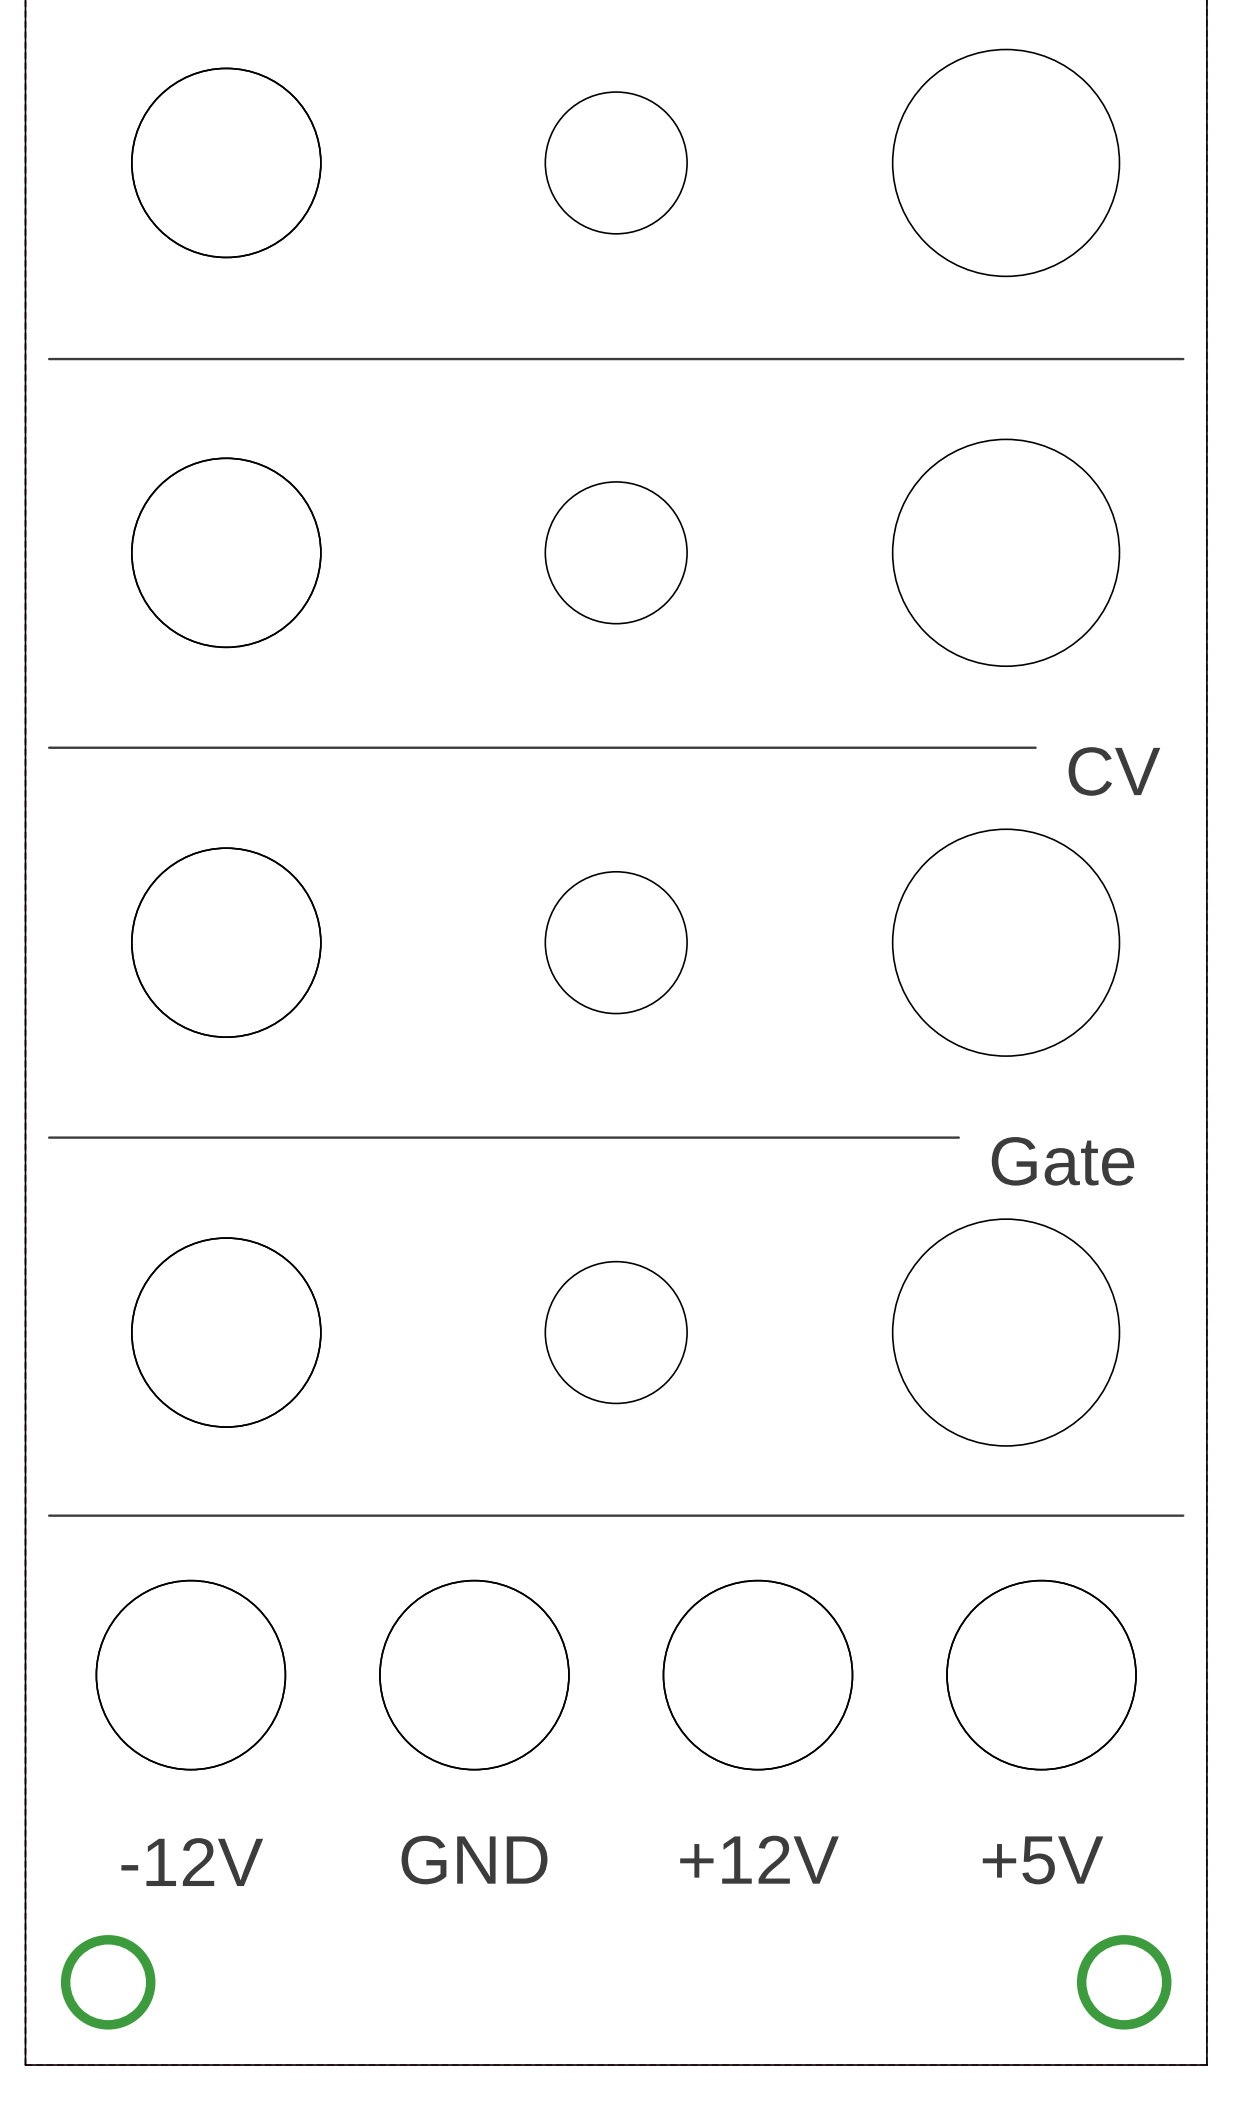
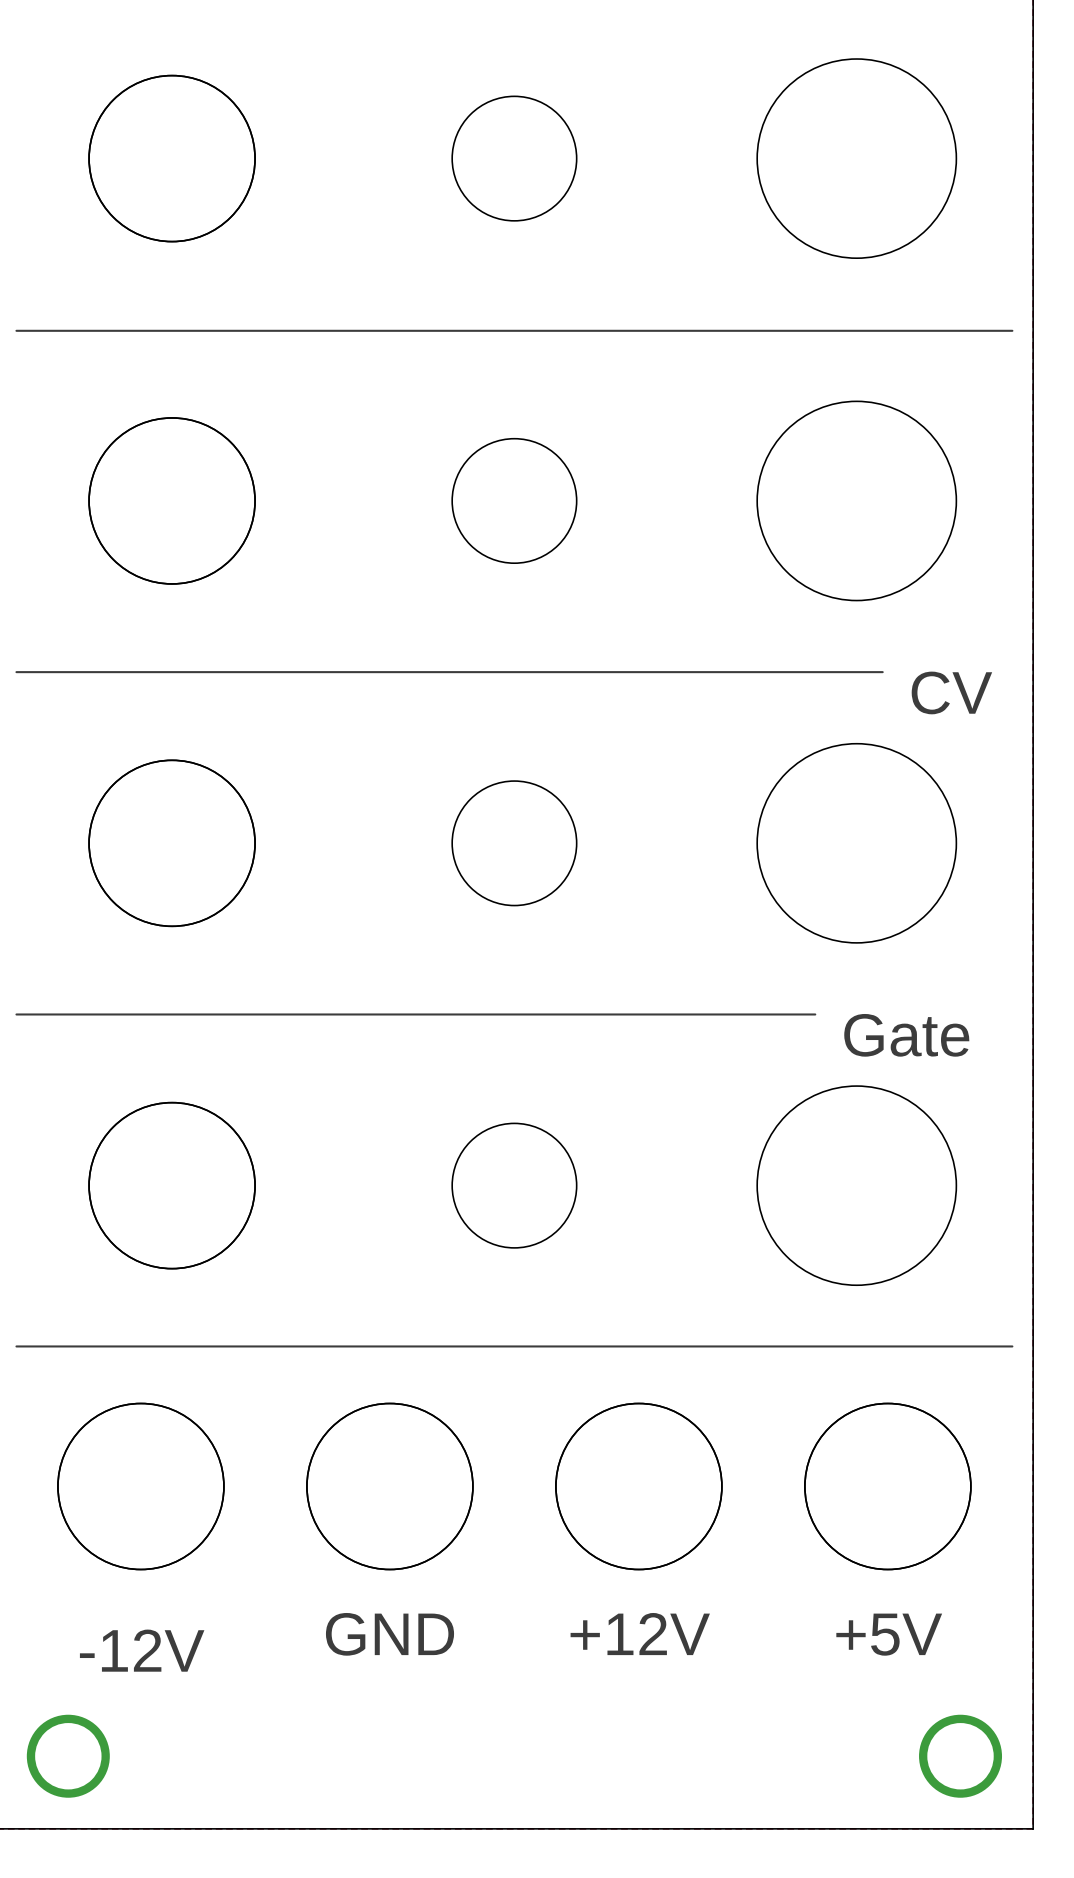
text position: +12V (759, 1859) -> +12V (640, 1634)
text position: GND (474, 1860) -> GND (390, 1634)
text position: +5V (1043, 1860) -> +5V (889, 1634)

